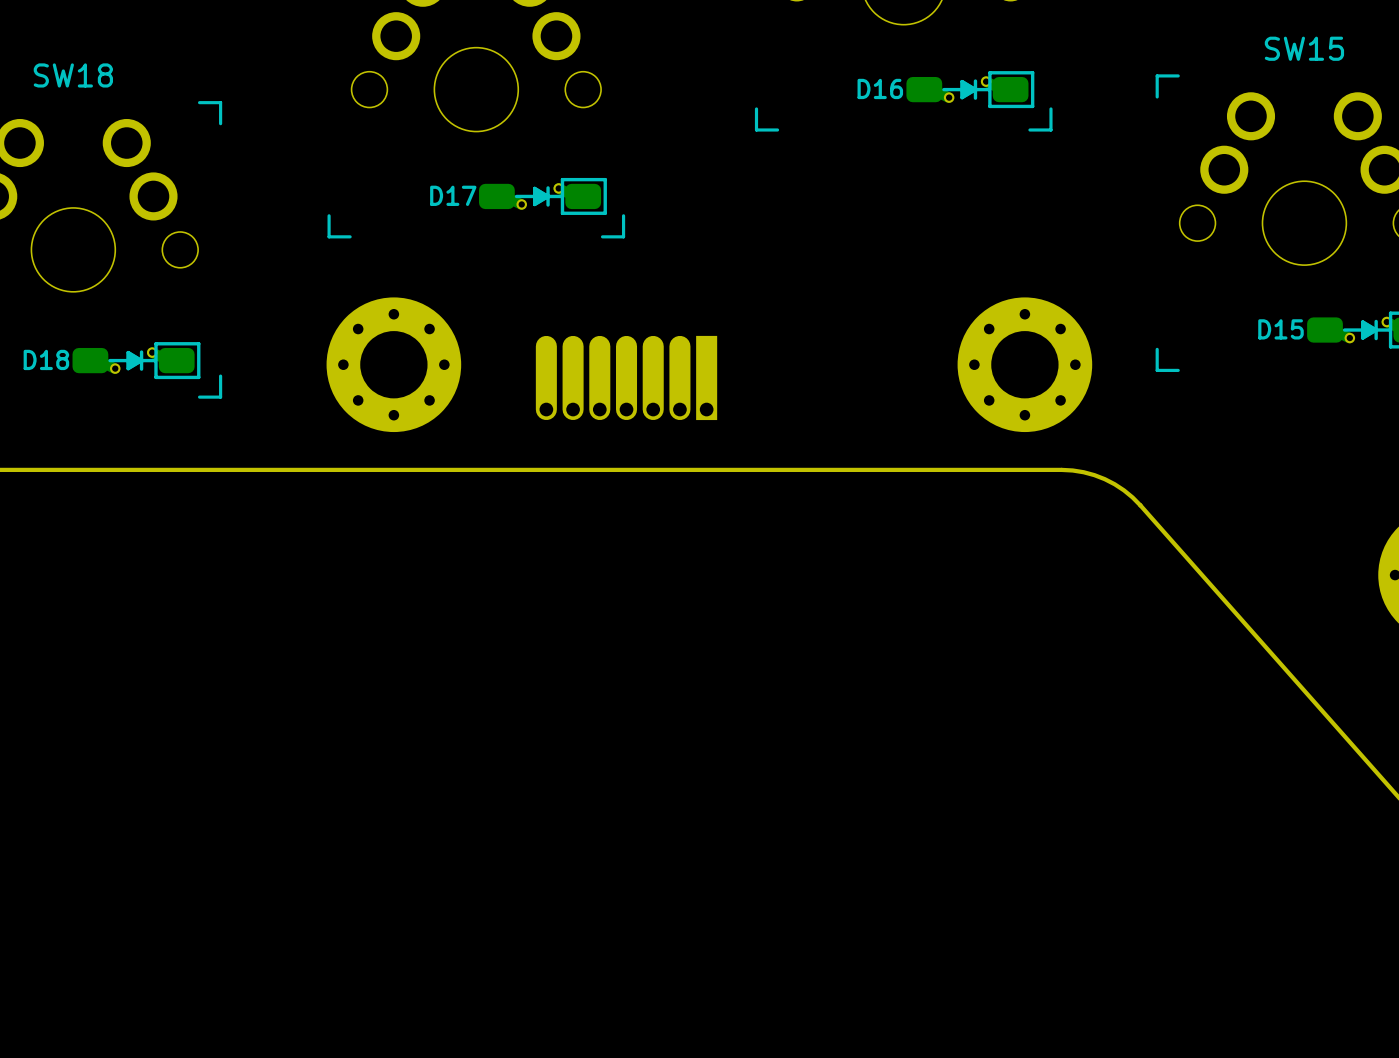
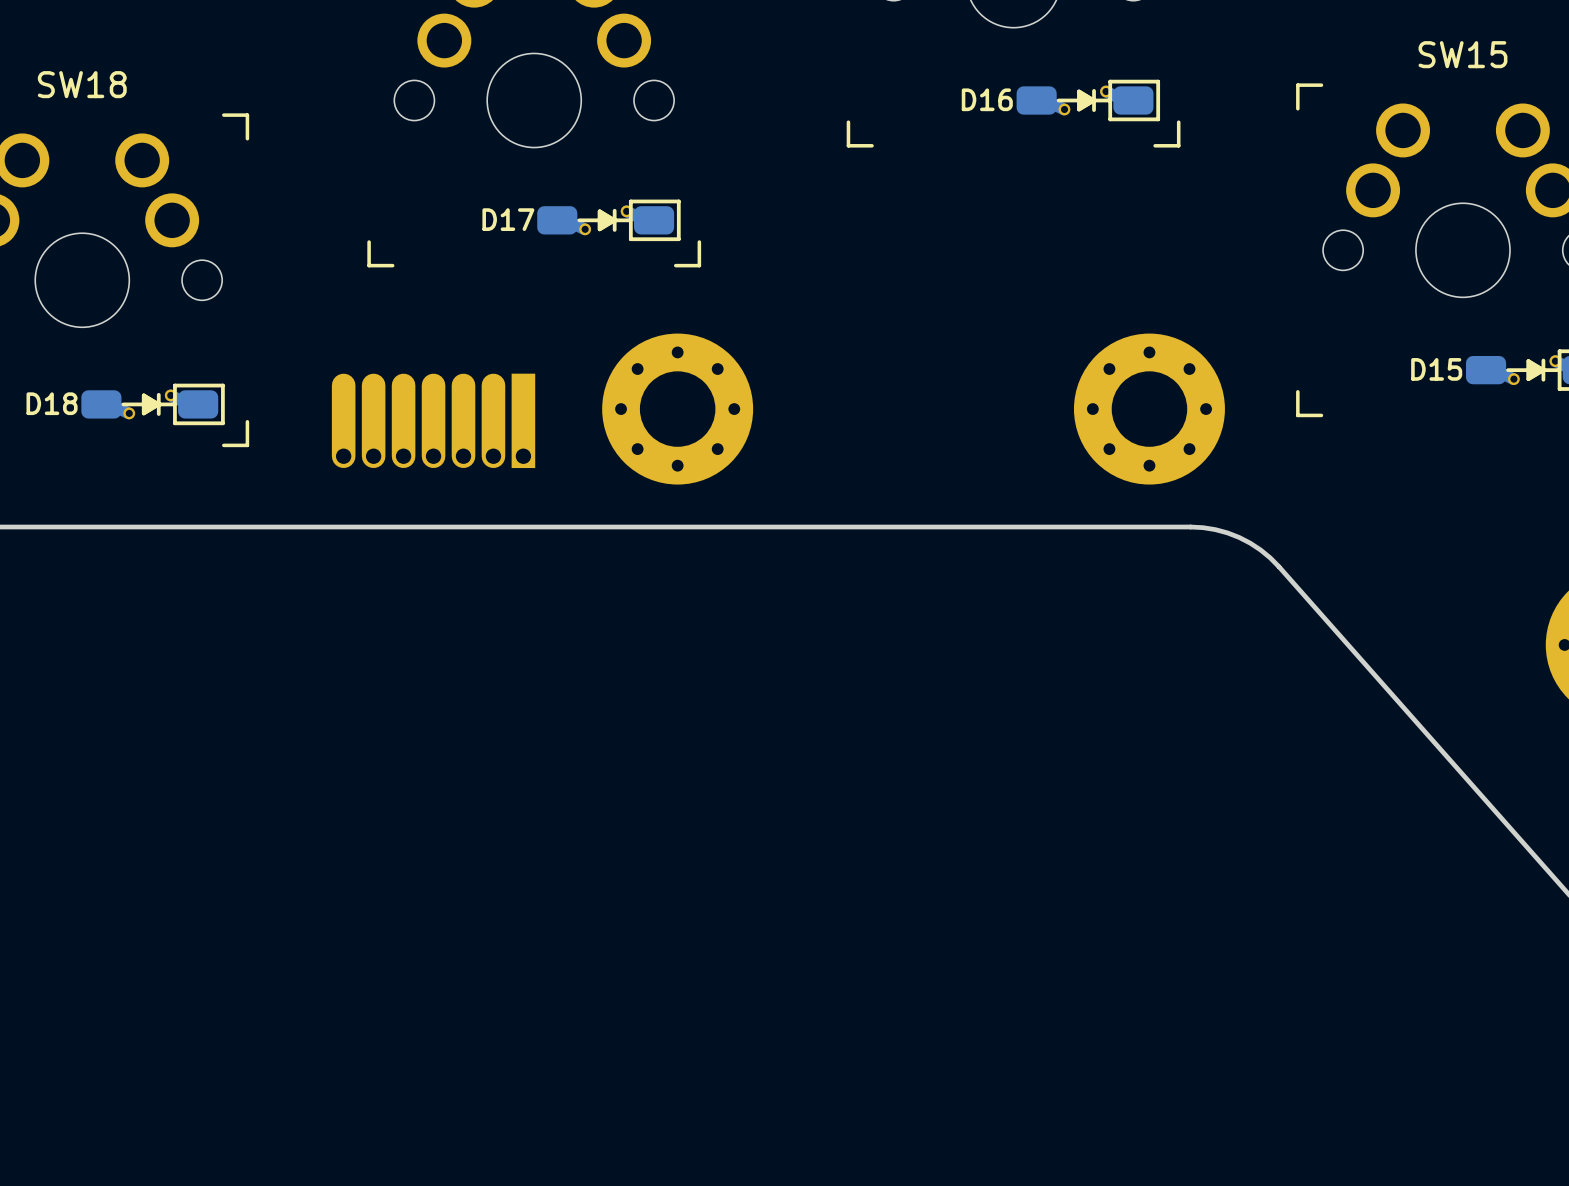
part footprint: [326, 297, 462, 433] -> [331, 373, 536, 469]
part: none -> (677, 409)
part: (626, 377) -> none

